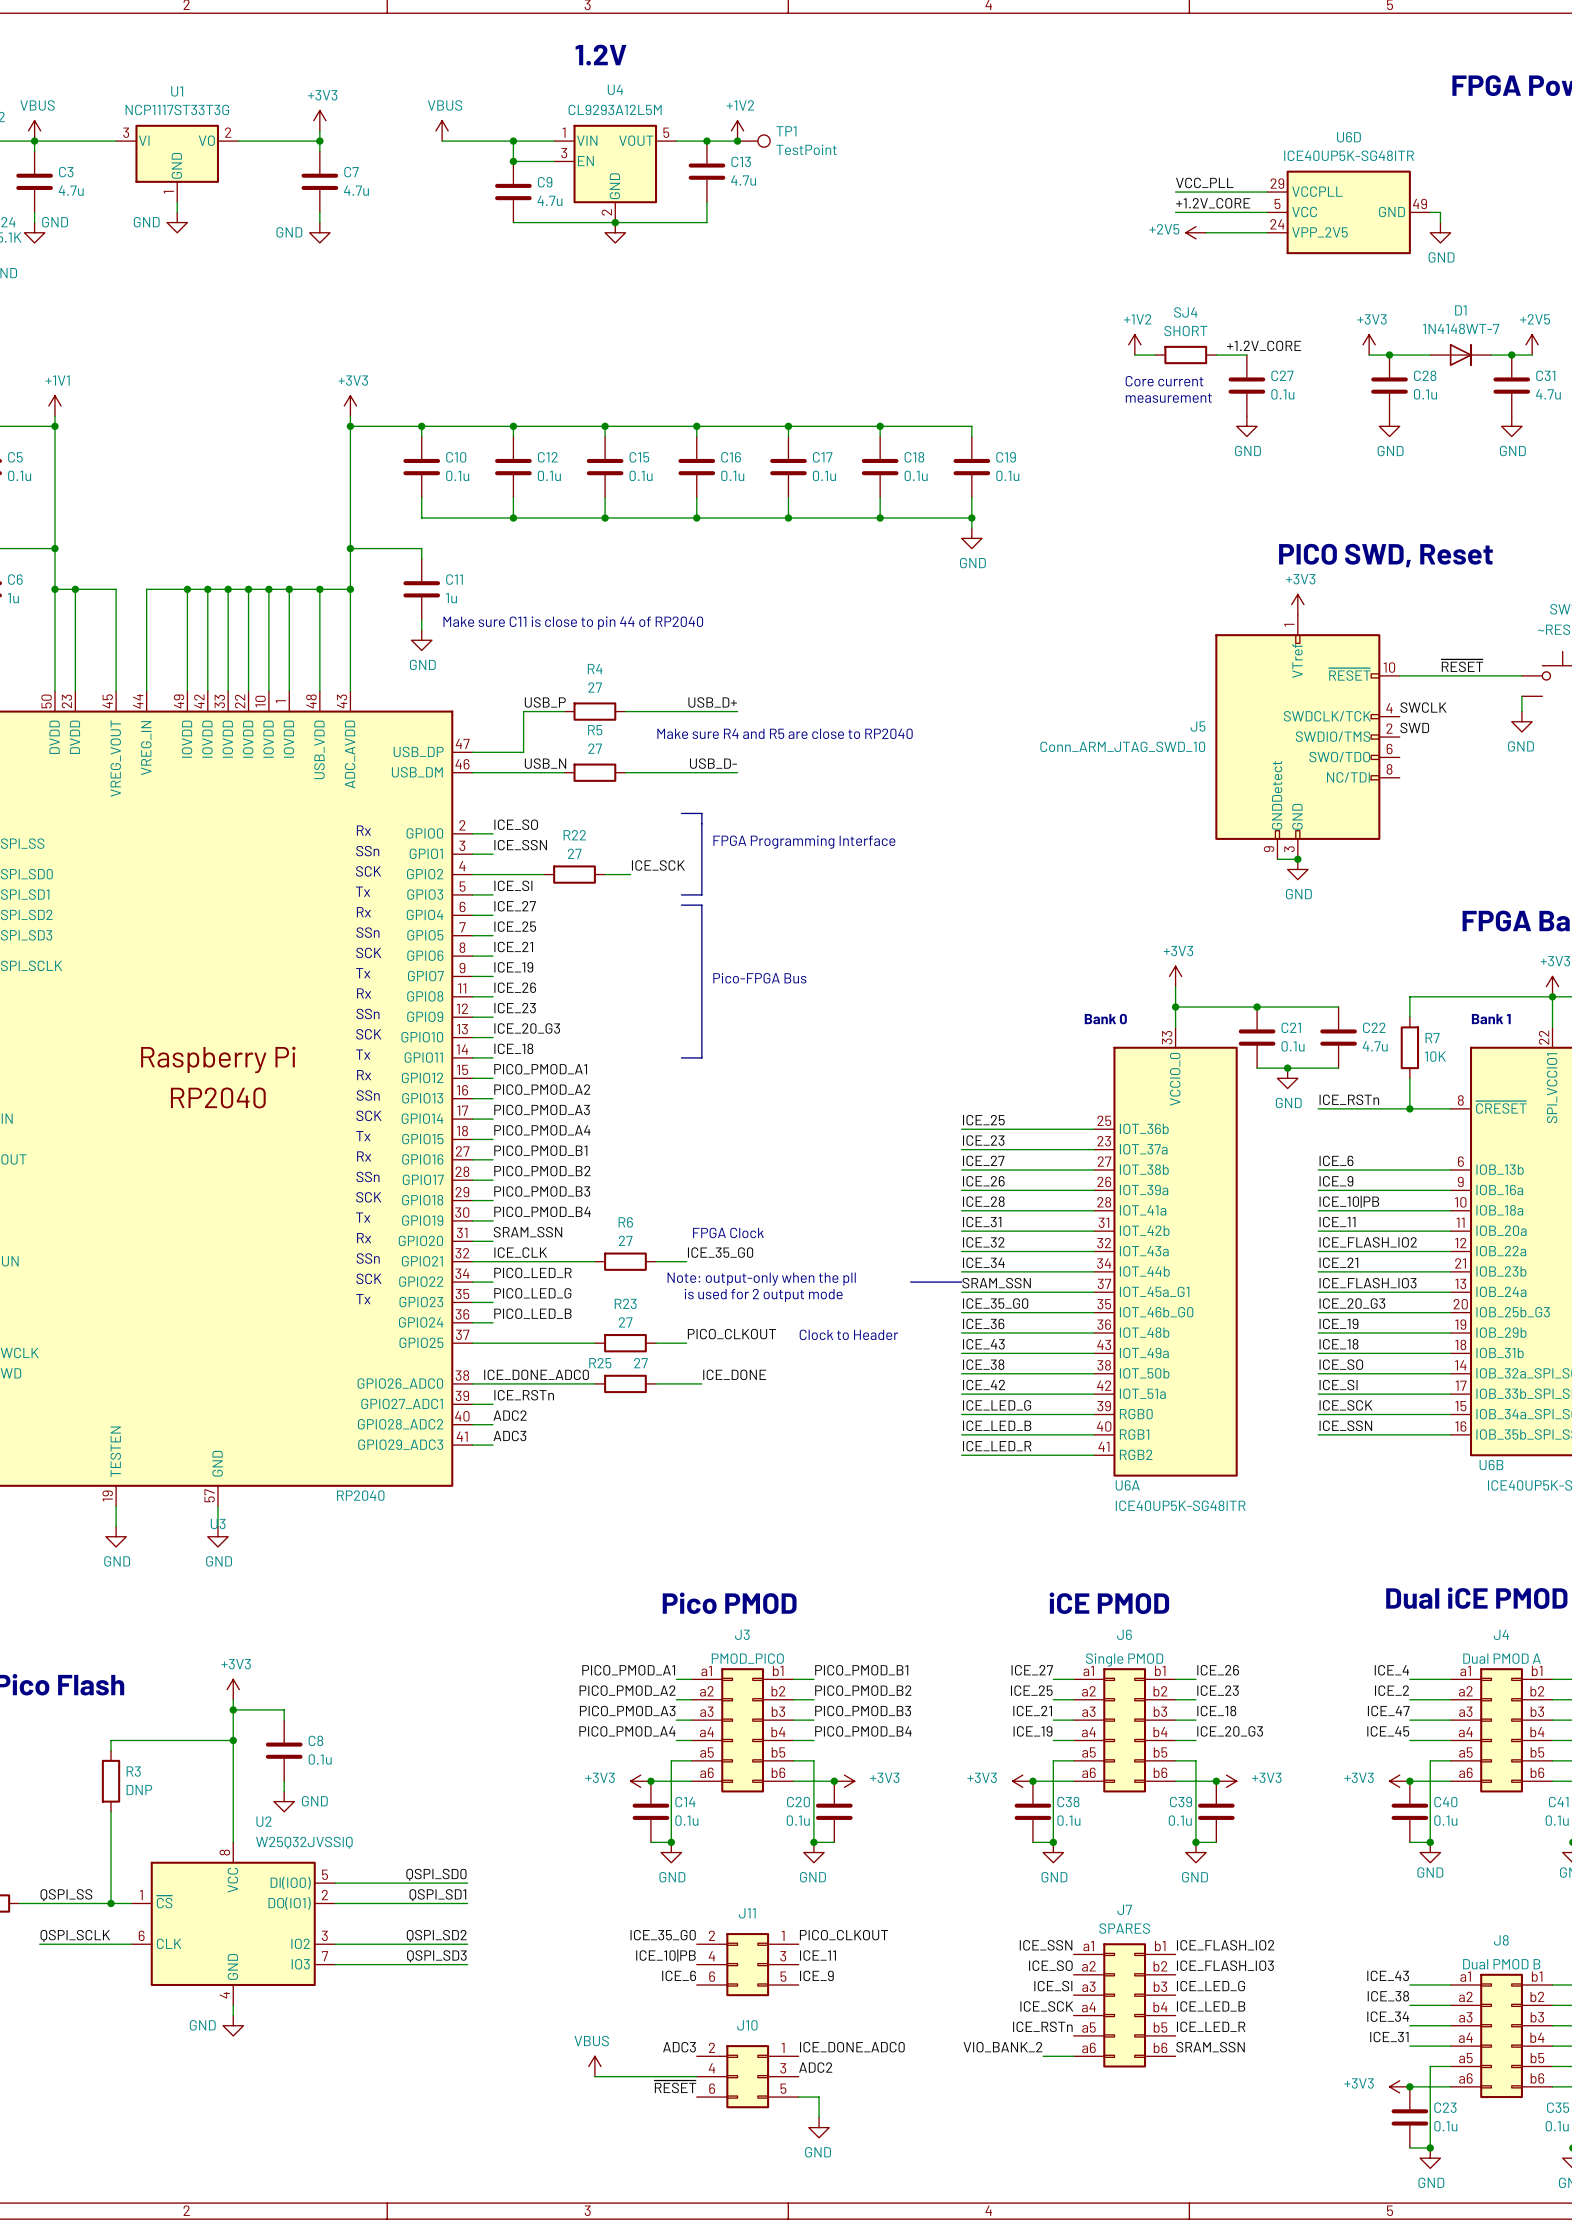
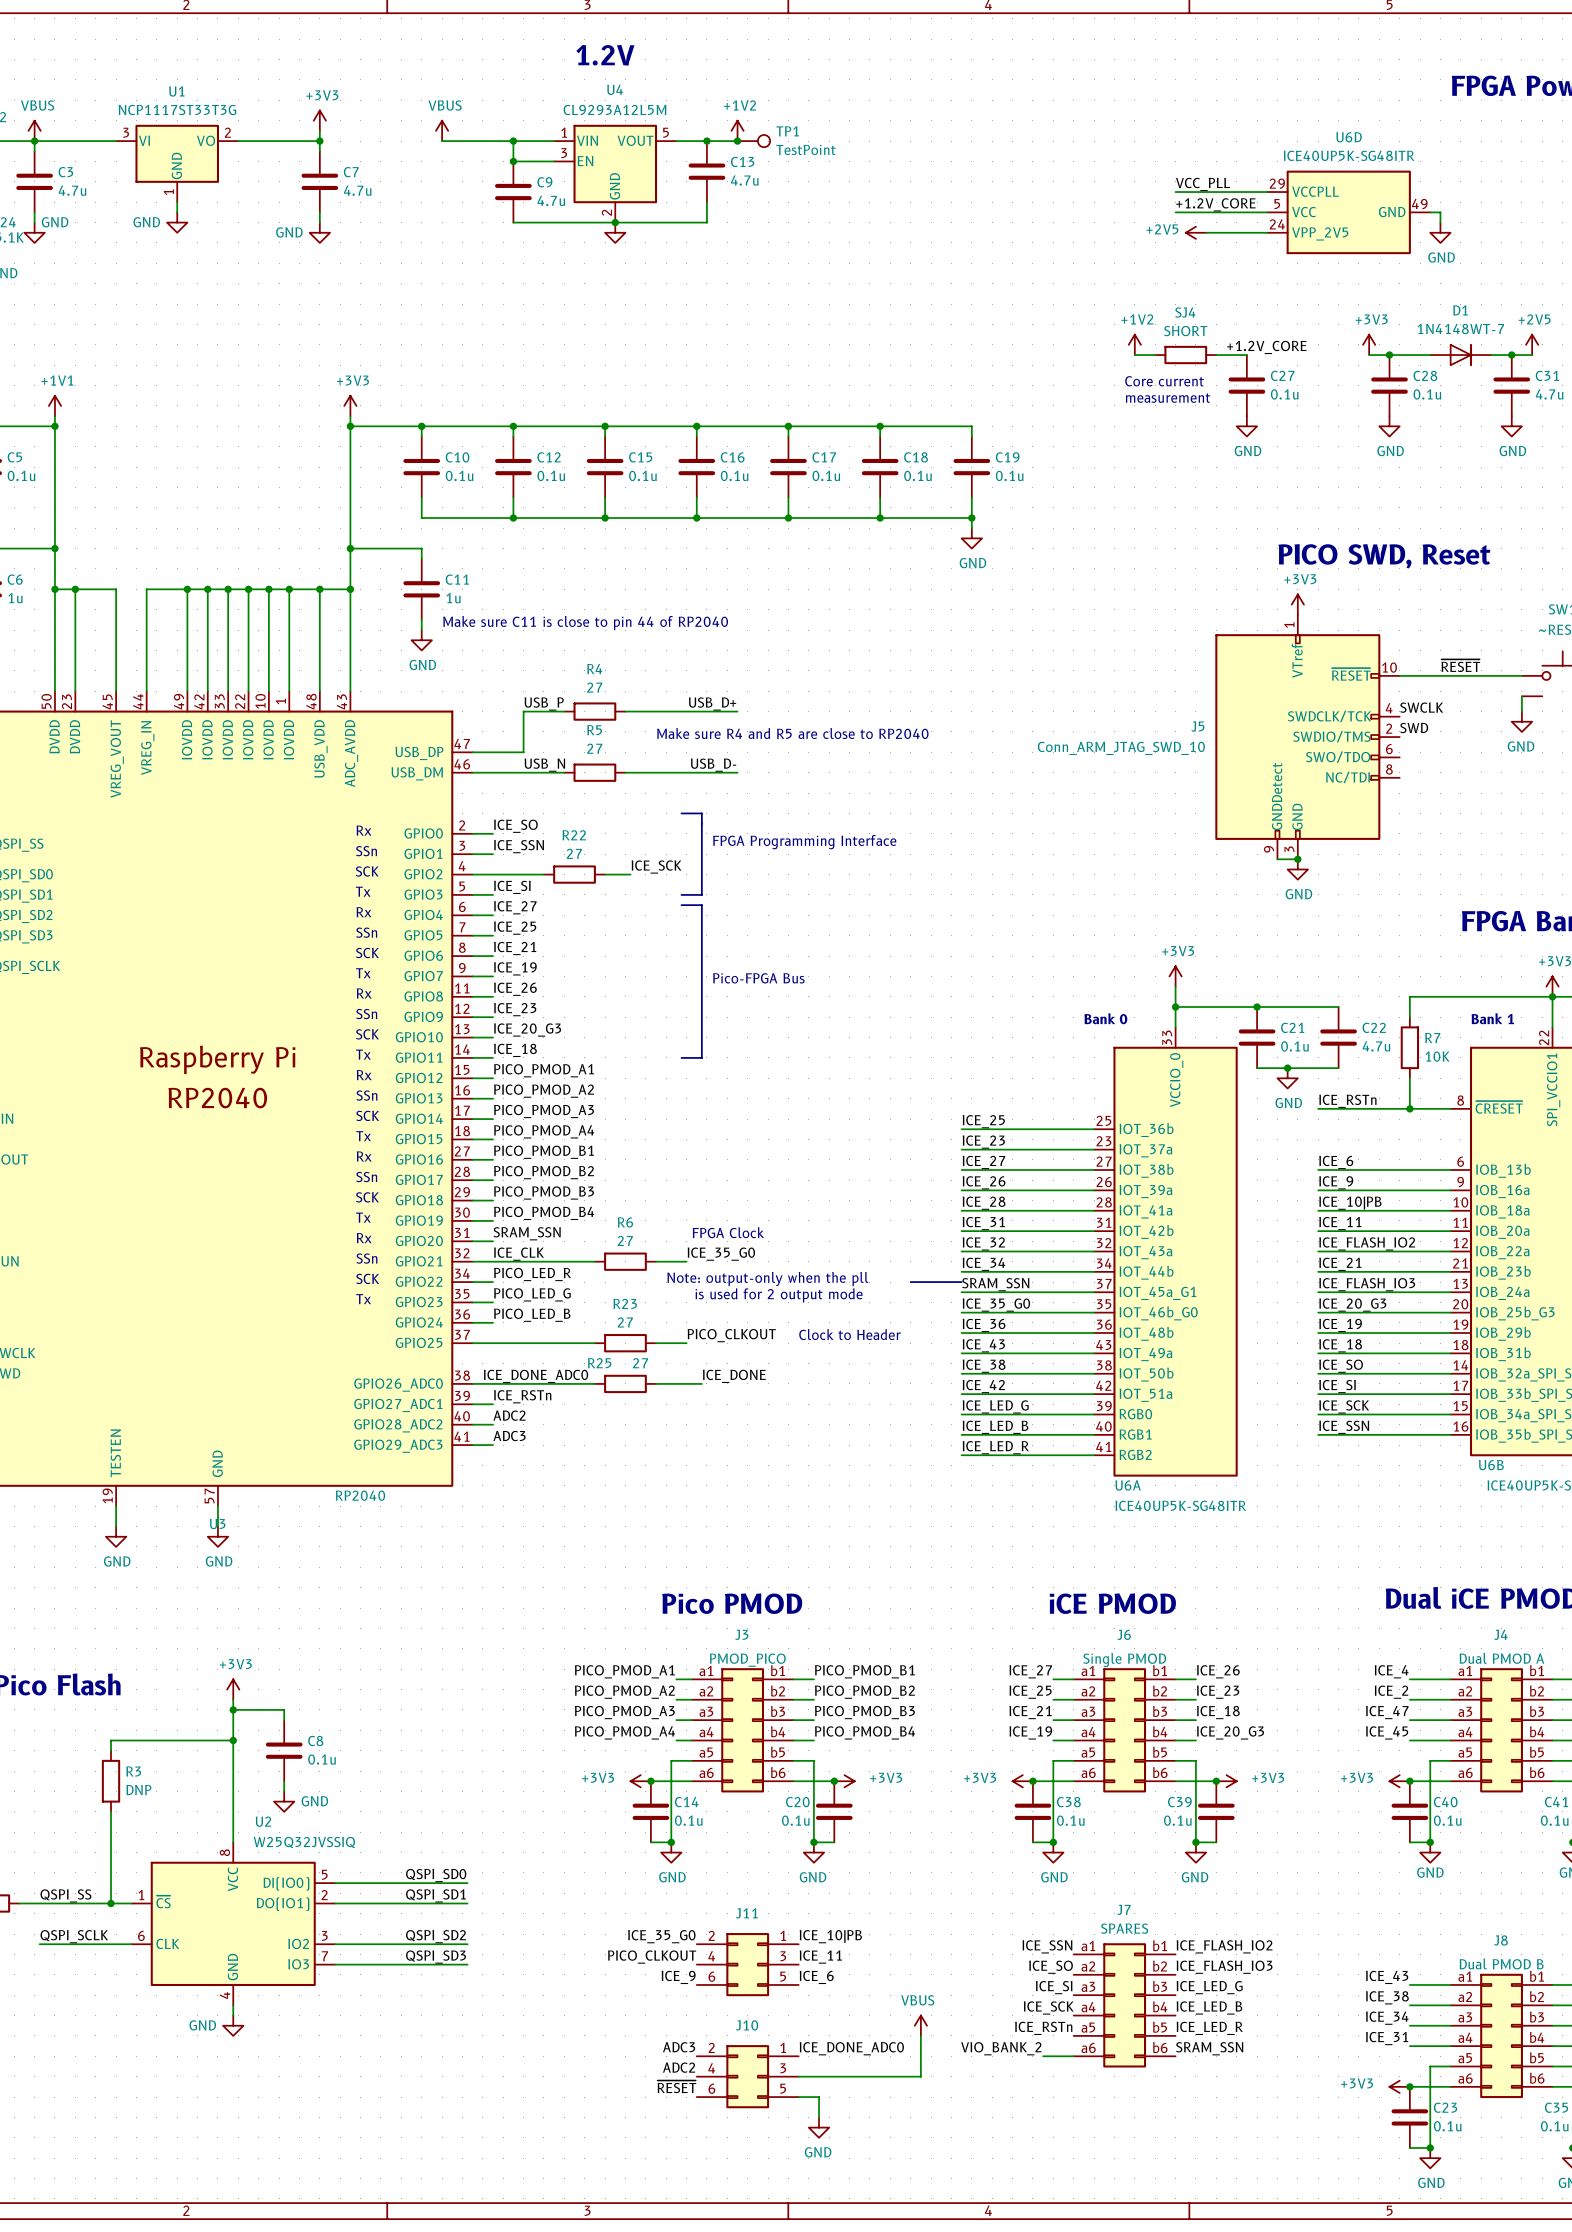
label: PICO_CLKOUT (844, 1935) -> ICE_10|PB (830, 1936)
label: ICE_10|PB (665, 1955) -> PICO_CLKOUT (652, 1957)
label: ICE_6 (679, 1975) -> ICE_9 (678, 1977)
label: ICE_9 (816, 1975) -> ICE_6 (816, 1977)
power symbol: none -> VBUS (920, 2025)
wire: none -> (920, 2035) (920, 2076) (798, 2076)
power symbol: VBUS (594, 2066) -> none
label position: ADC2 (815, 2067) -> ADC2 (679, 2067)
wire: (594, 2076) (696, 2076) -> none

